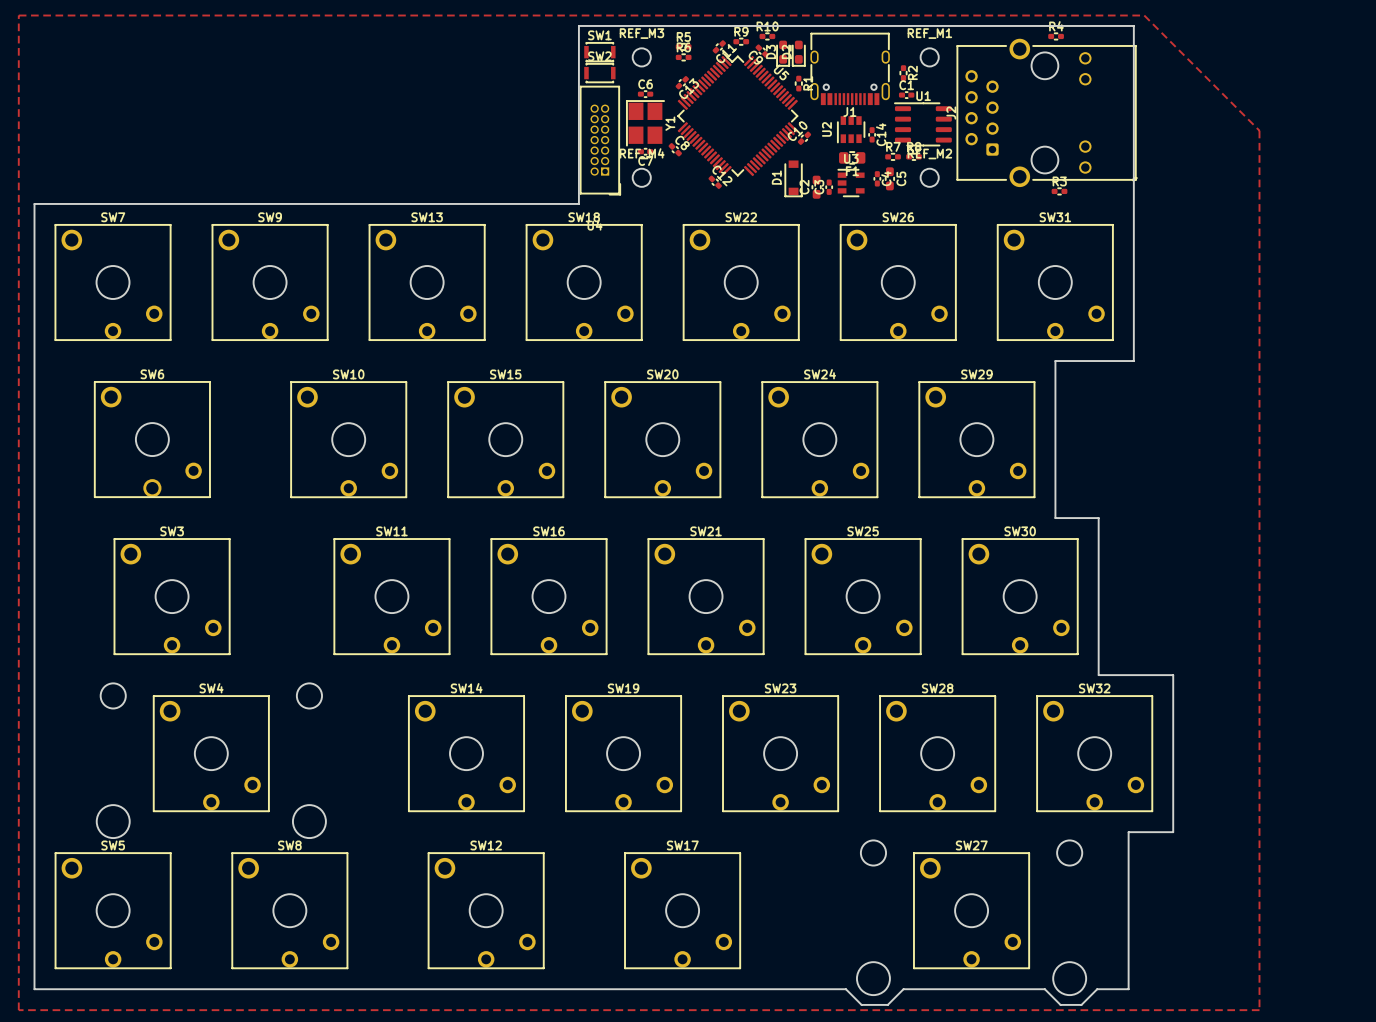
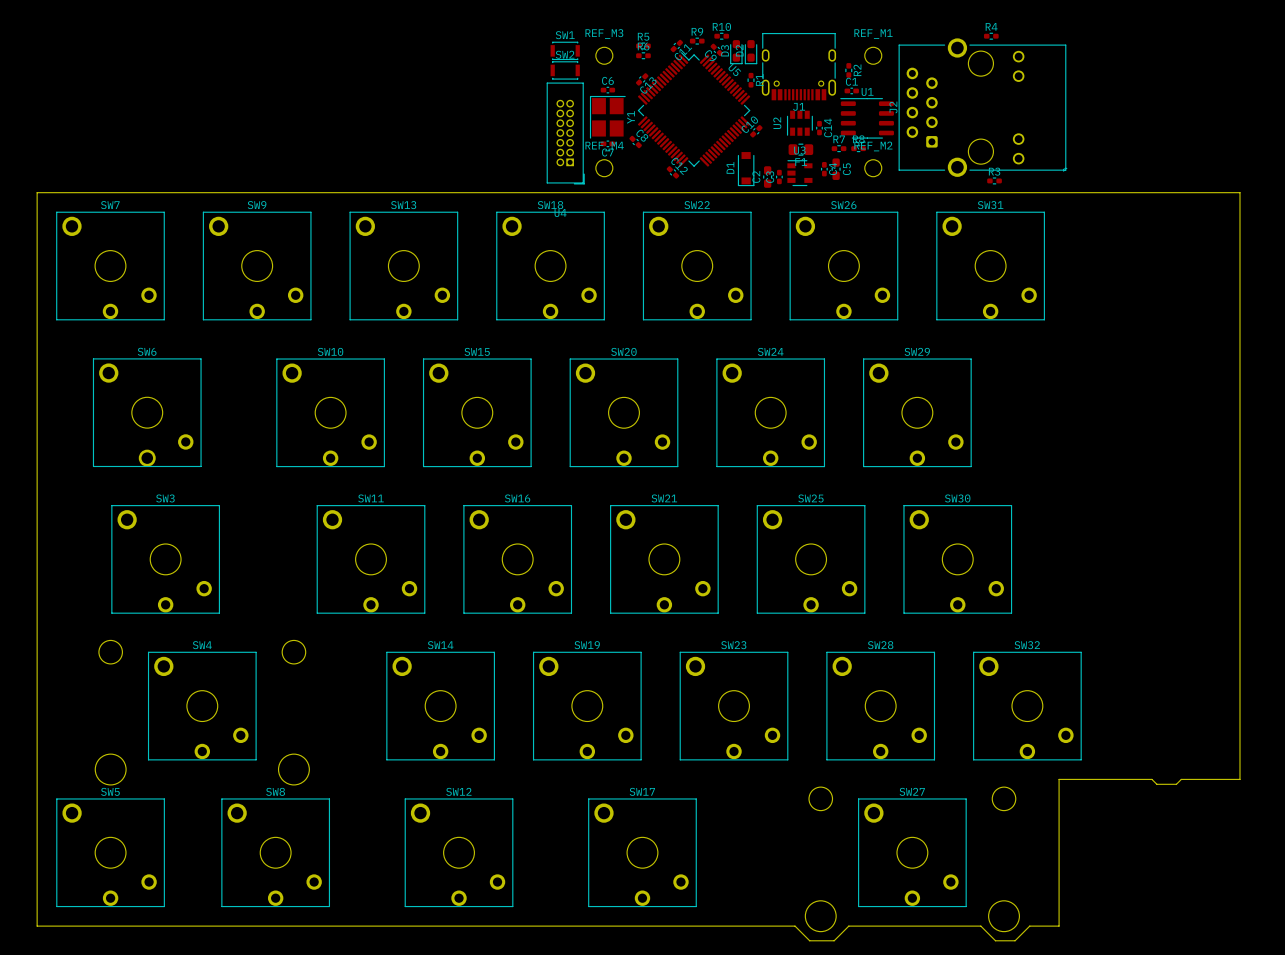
zone outline: (18, 15) (18, 1010) (1259, 1010) (1259, 130) (1144, 15) (18, 15) -> none
board edge: (578, 203) (578, 25) (1133, 25) (1133, 361) (1055, 361) (1055, 518) (1098, 518) (1098, 675) (1173, 675) (1173, 832) -> (545, 192) (1239, 192) (1239, 779) (1181, 779) (1176, 784) (1156, 784) (1151, 779) (1100, 779)

